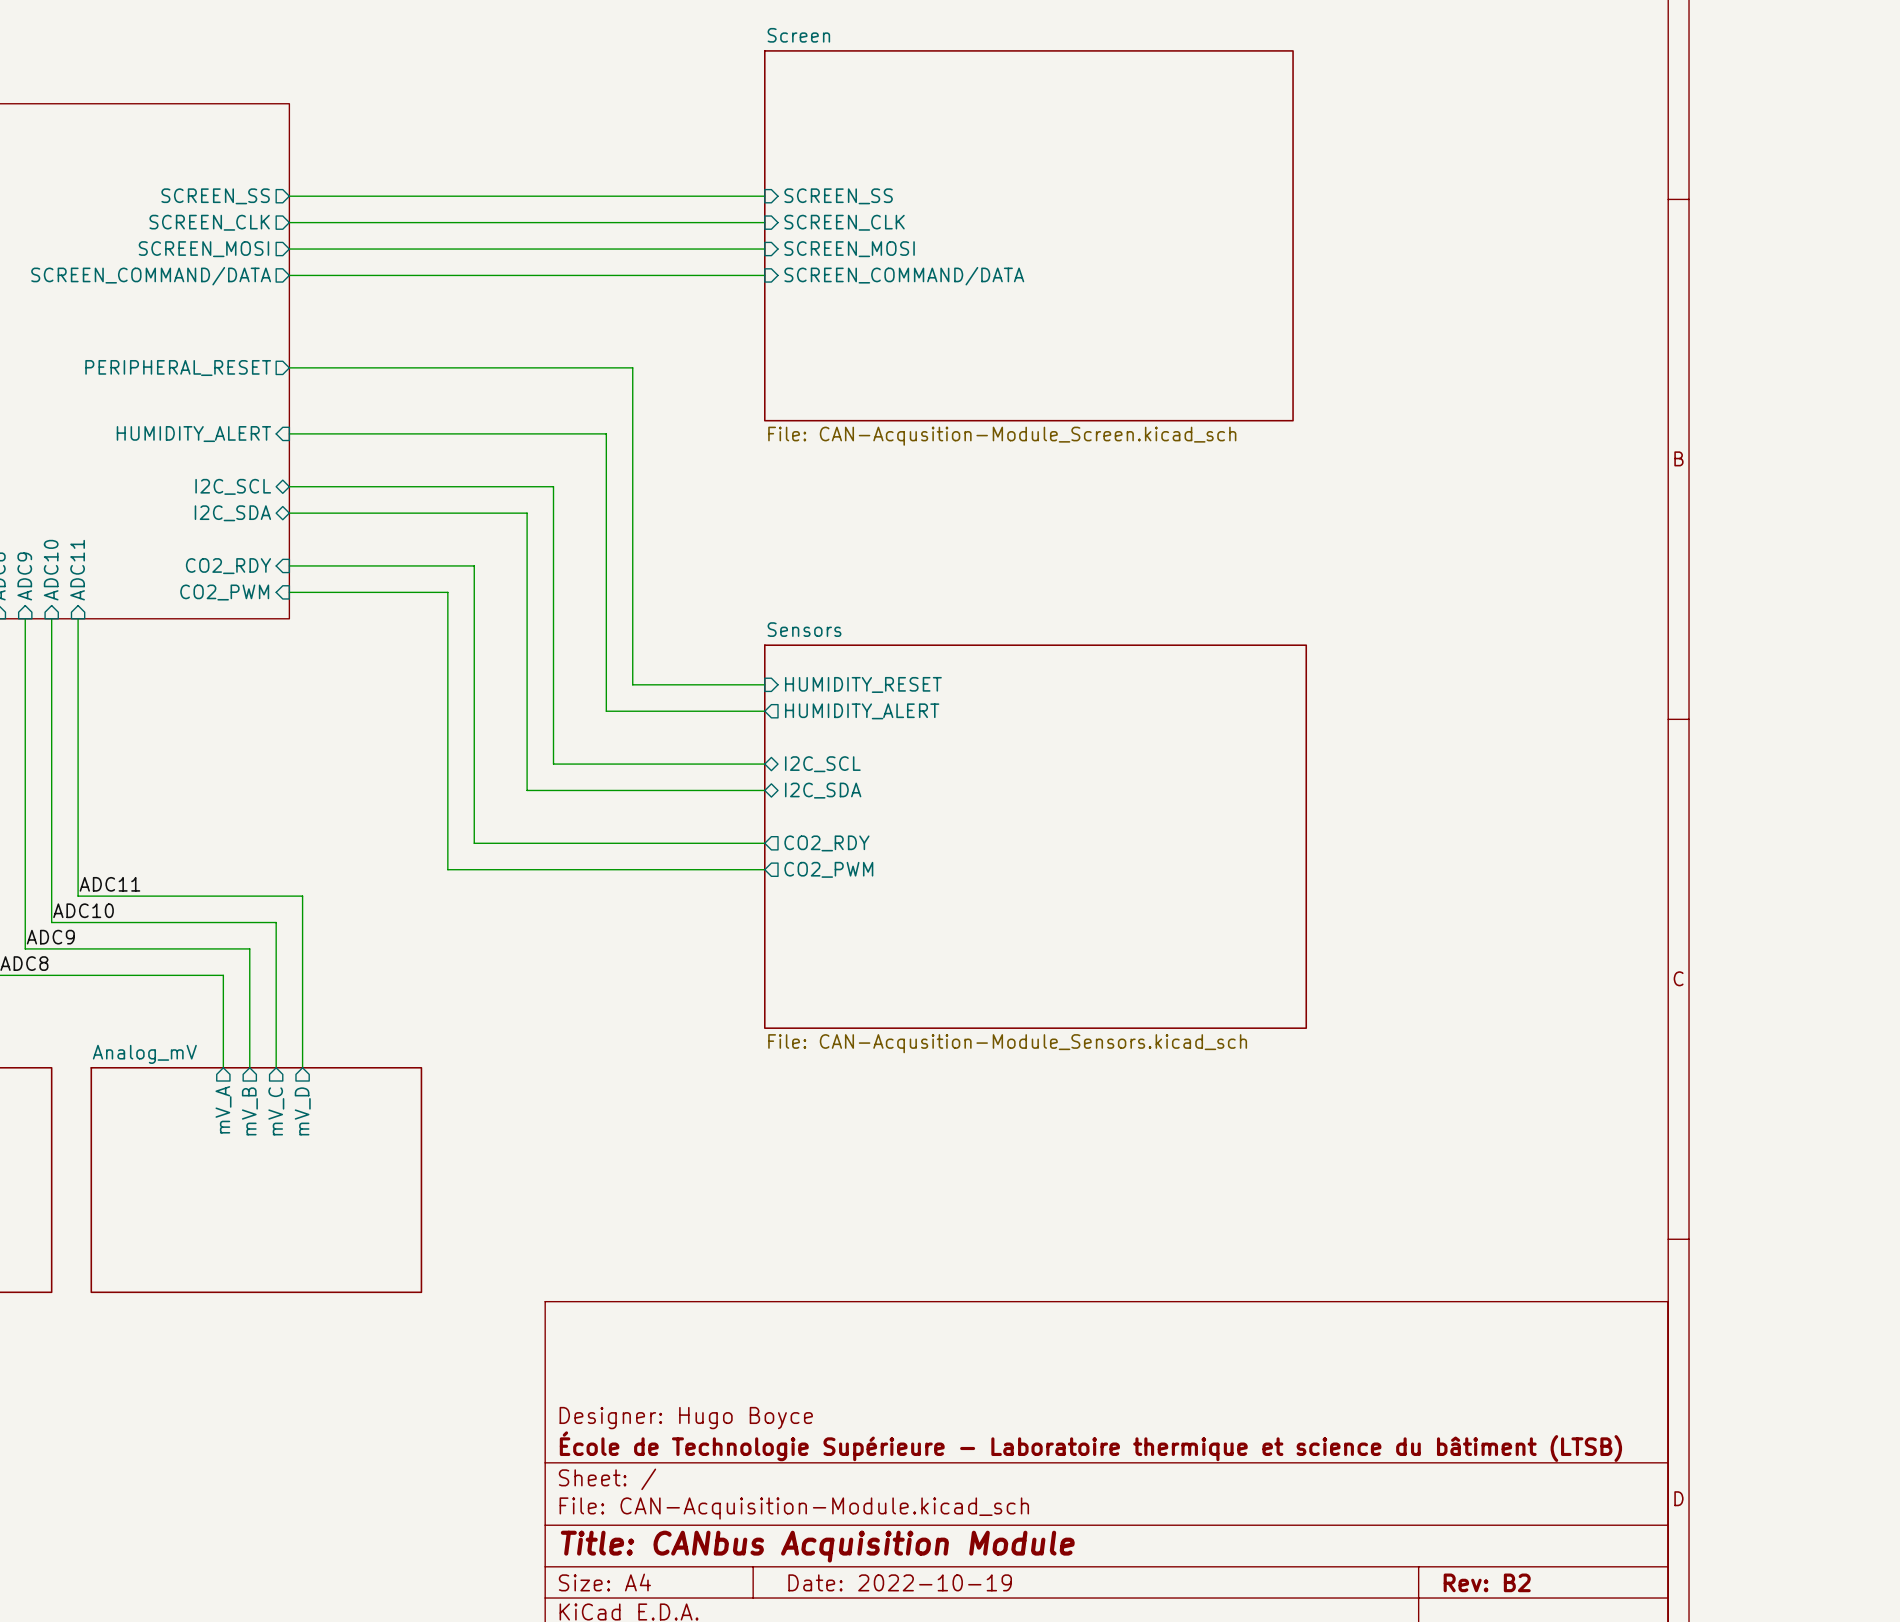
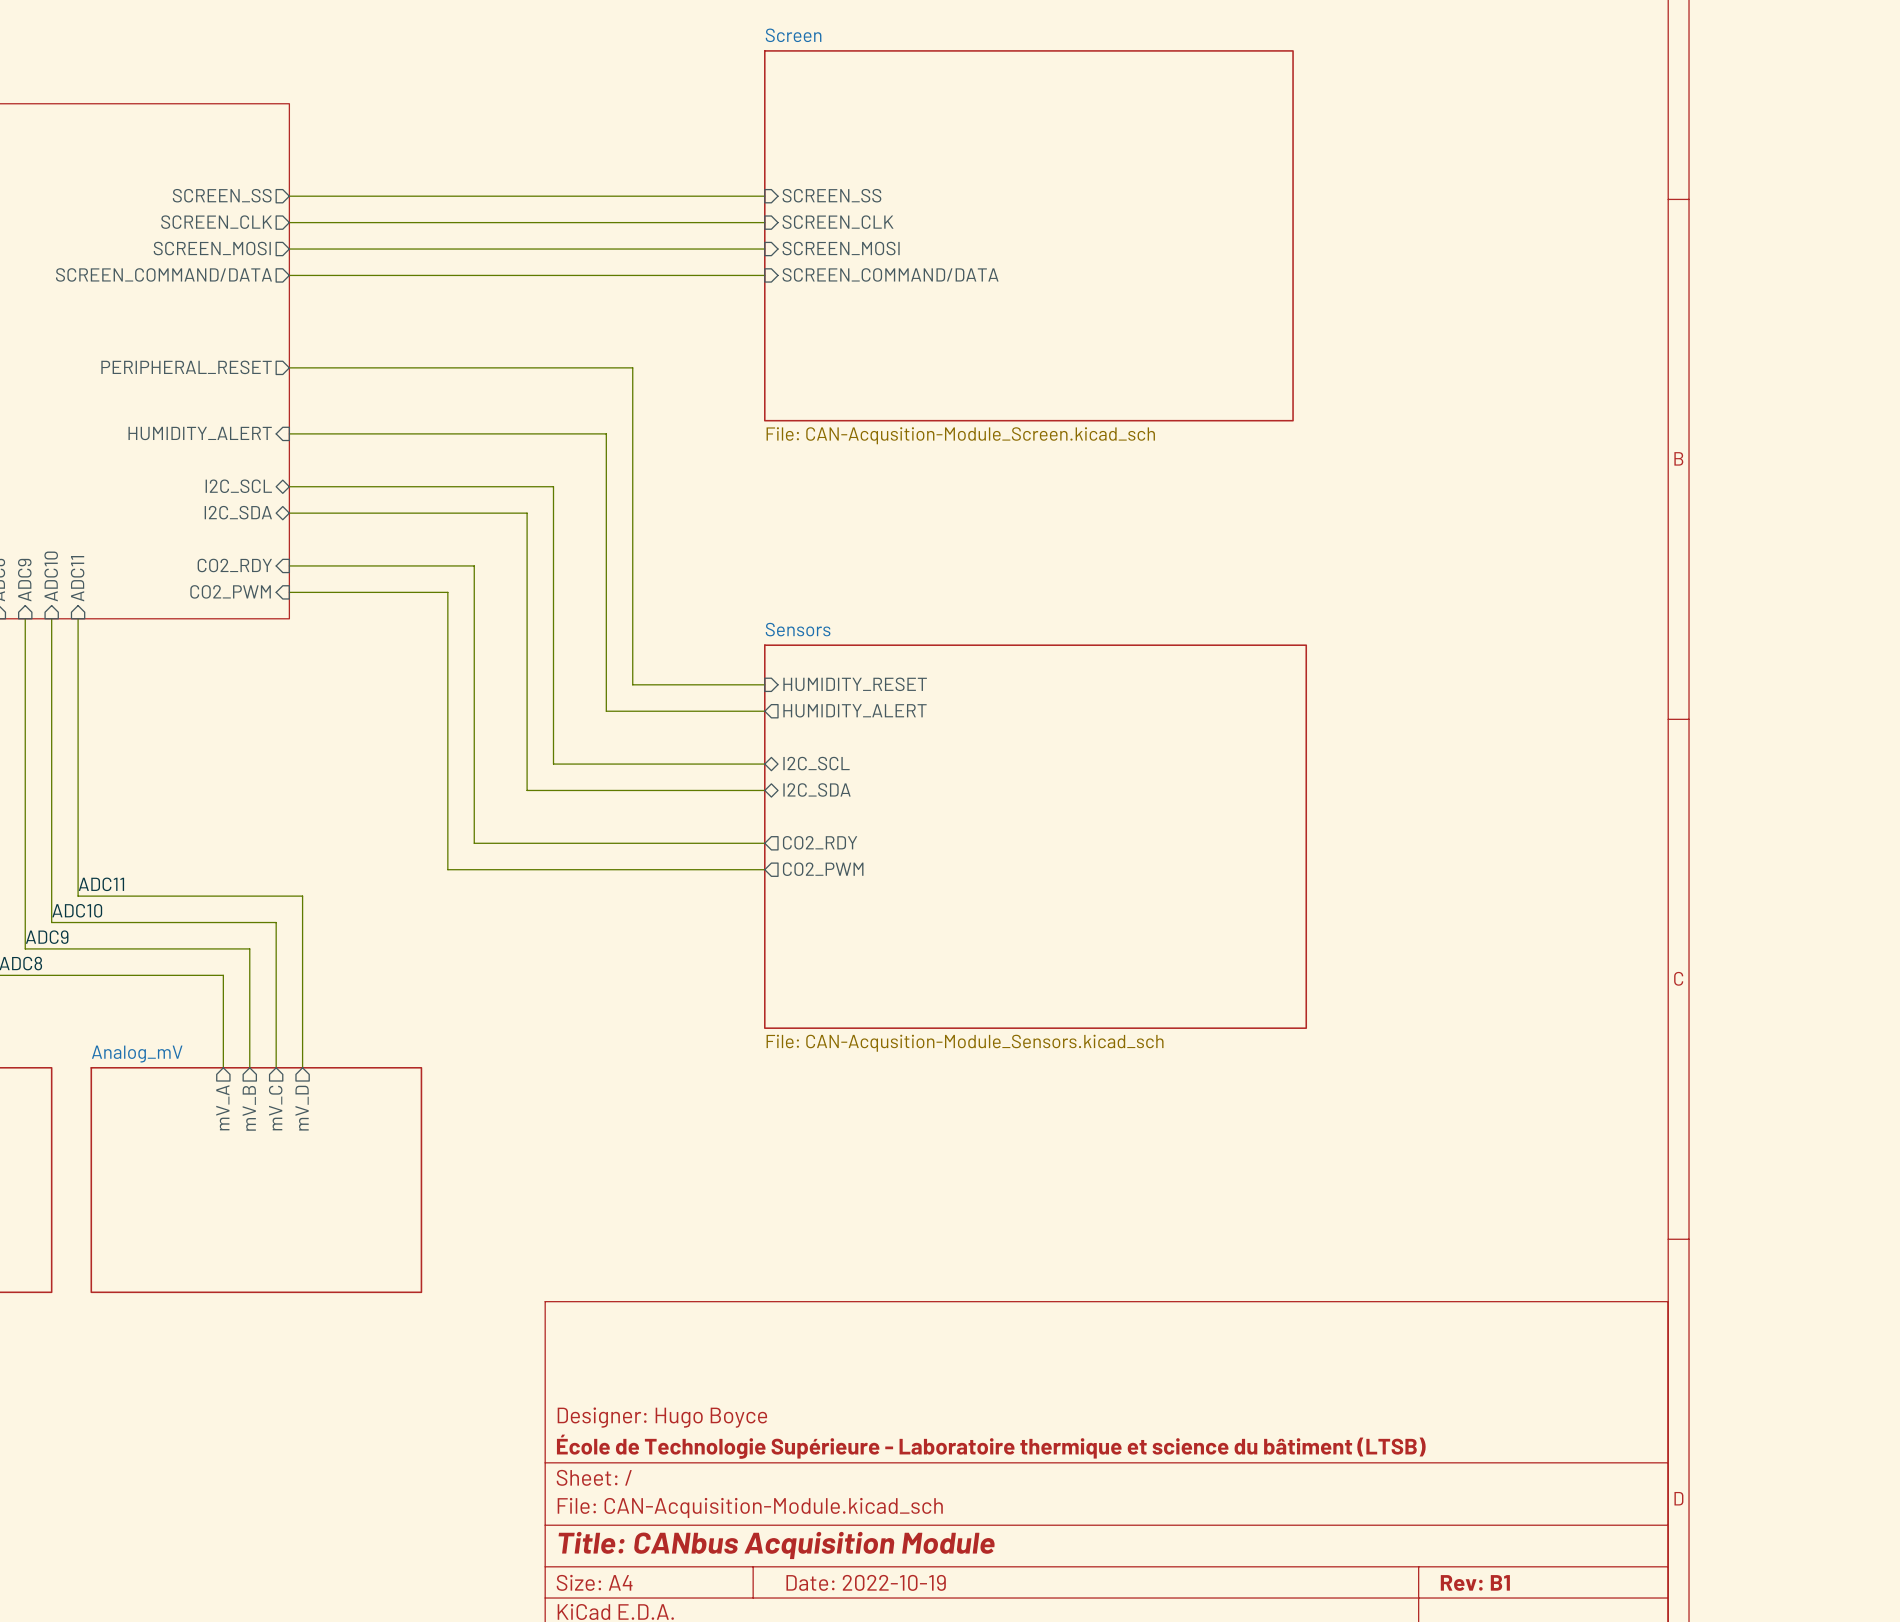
title block: Rev: B2 (1487, 1582) -> Rev: B1 (1475, 1582)

